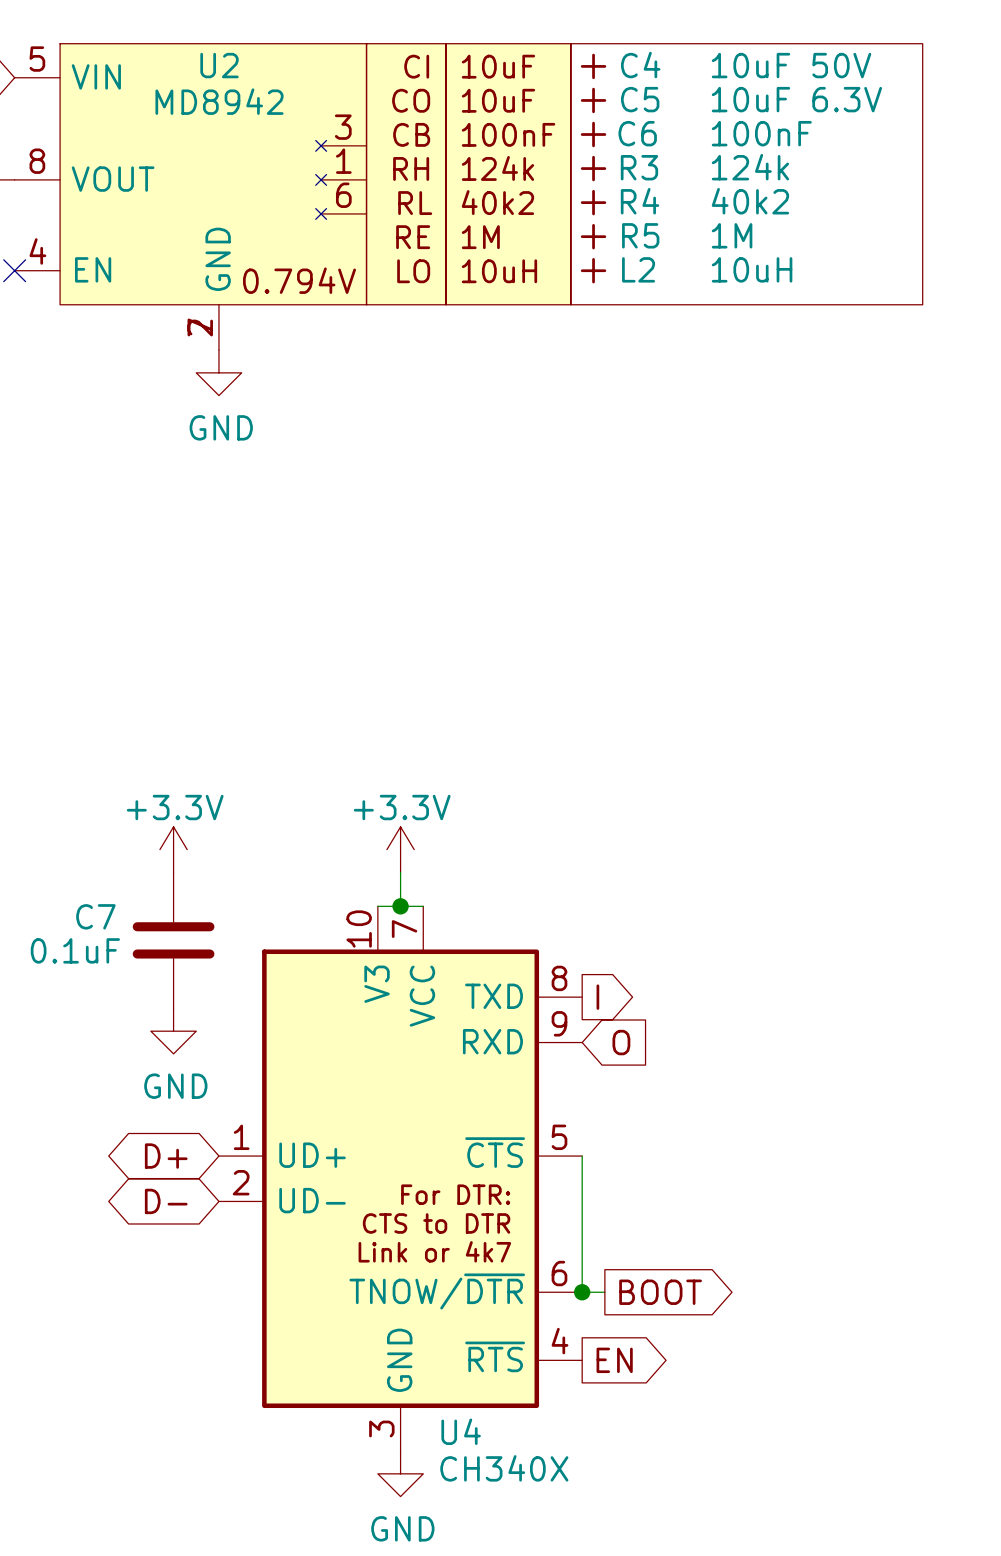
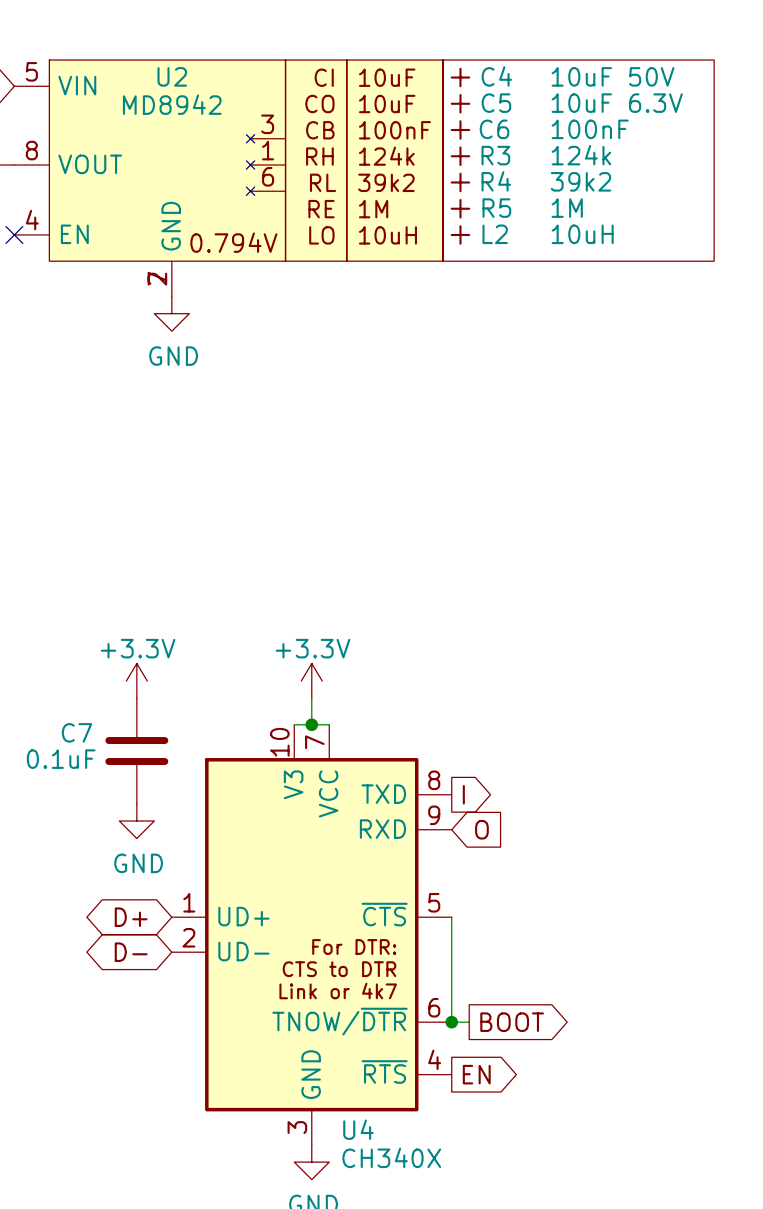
R4 value: 40k2 (750, 201) -> 39k2 (580, 181)
U2 text: 40k2 (497, 202) -> 39k2 (386, 182)

